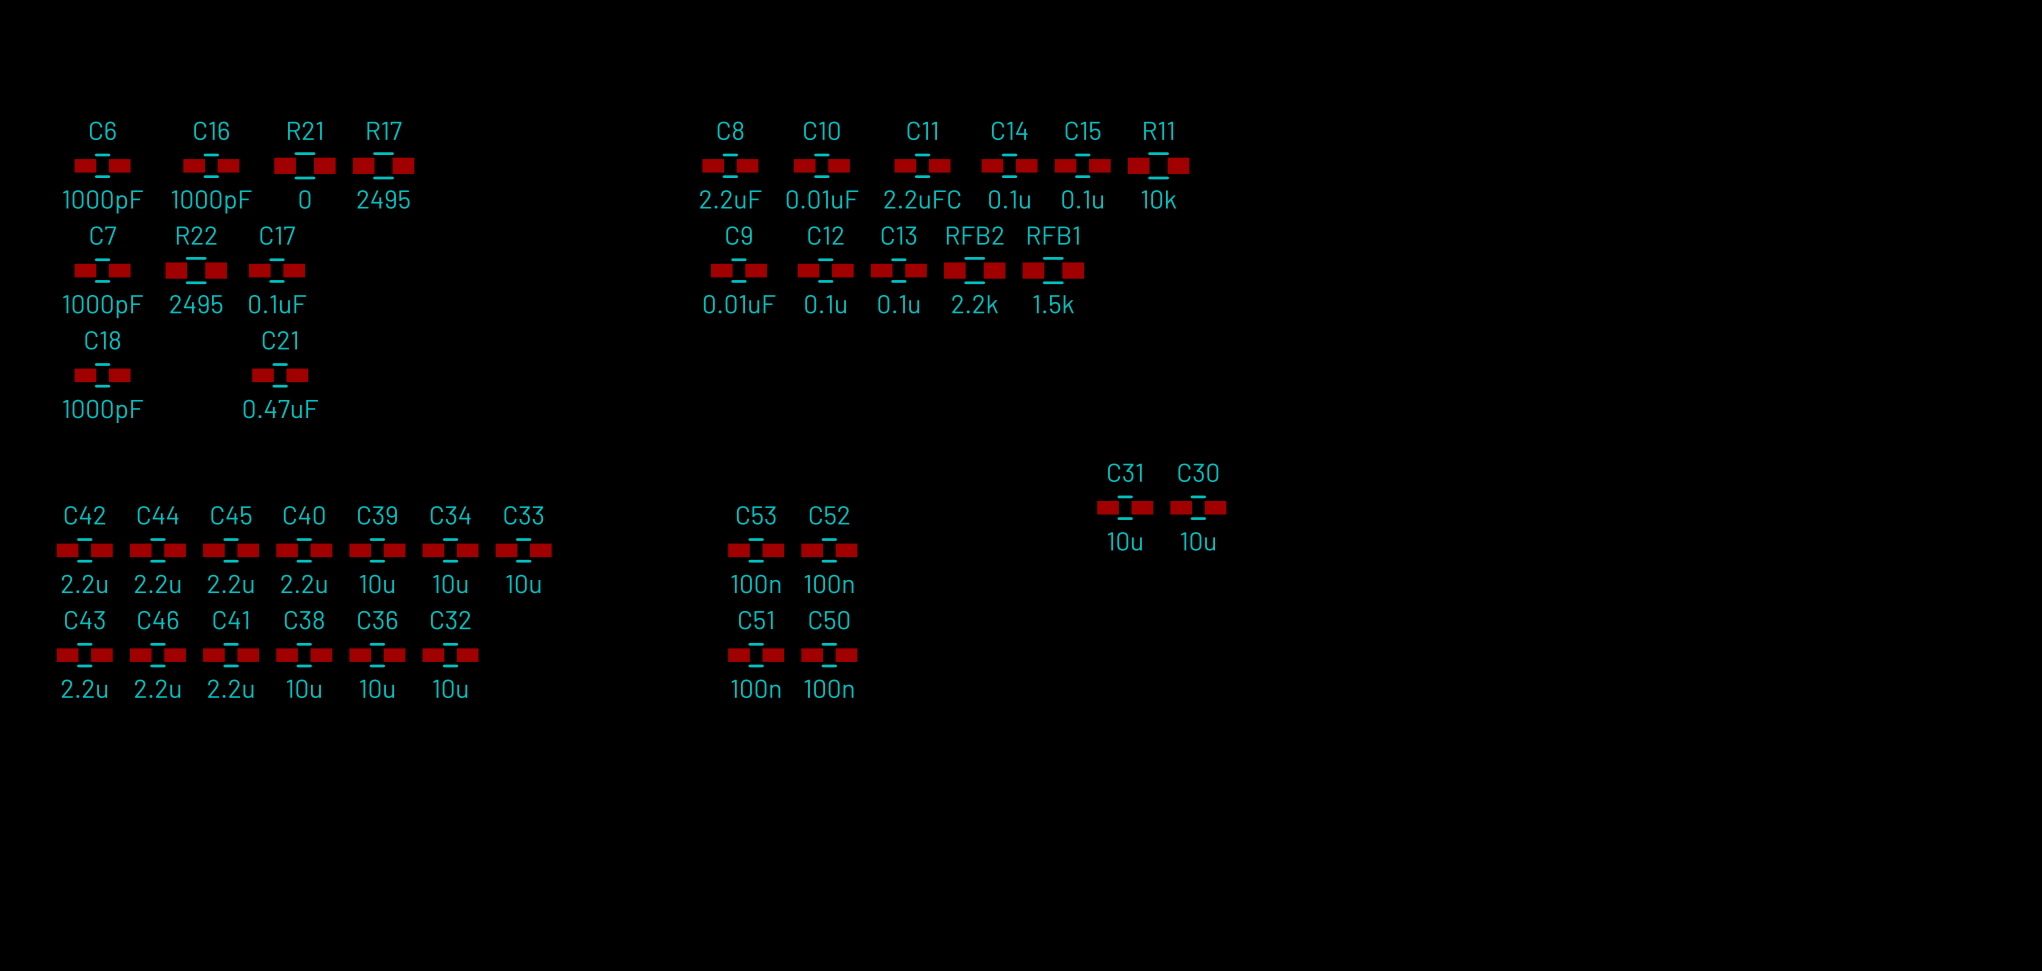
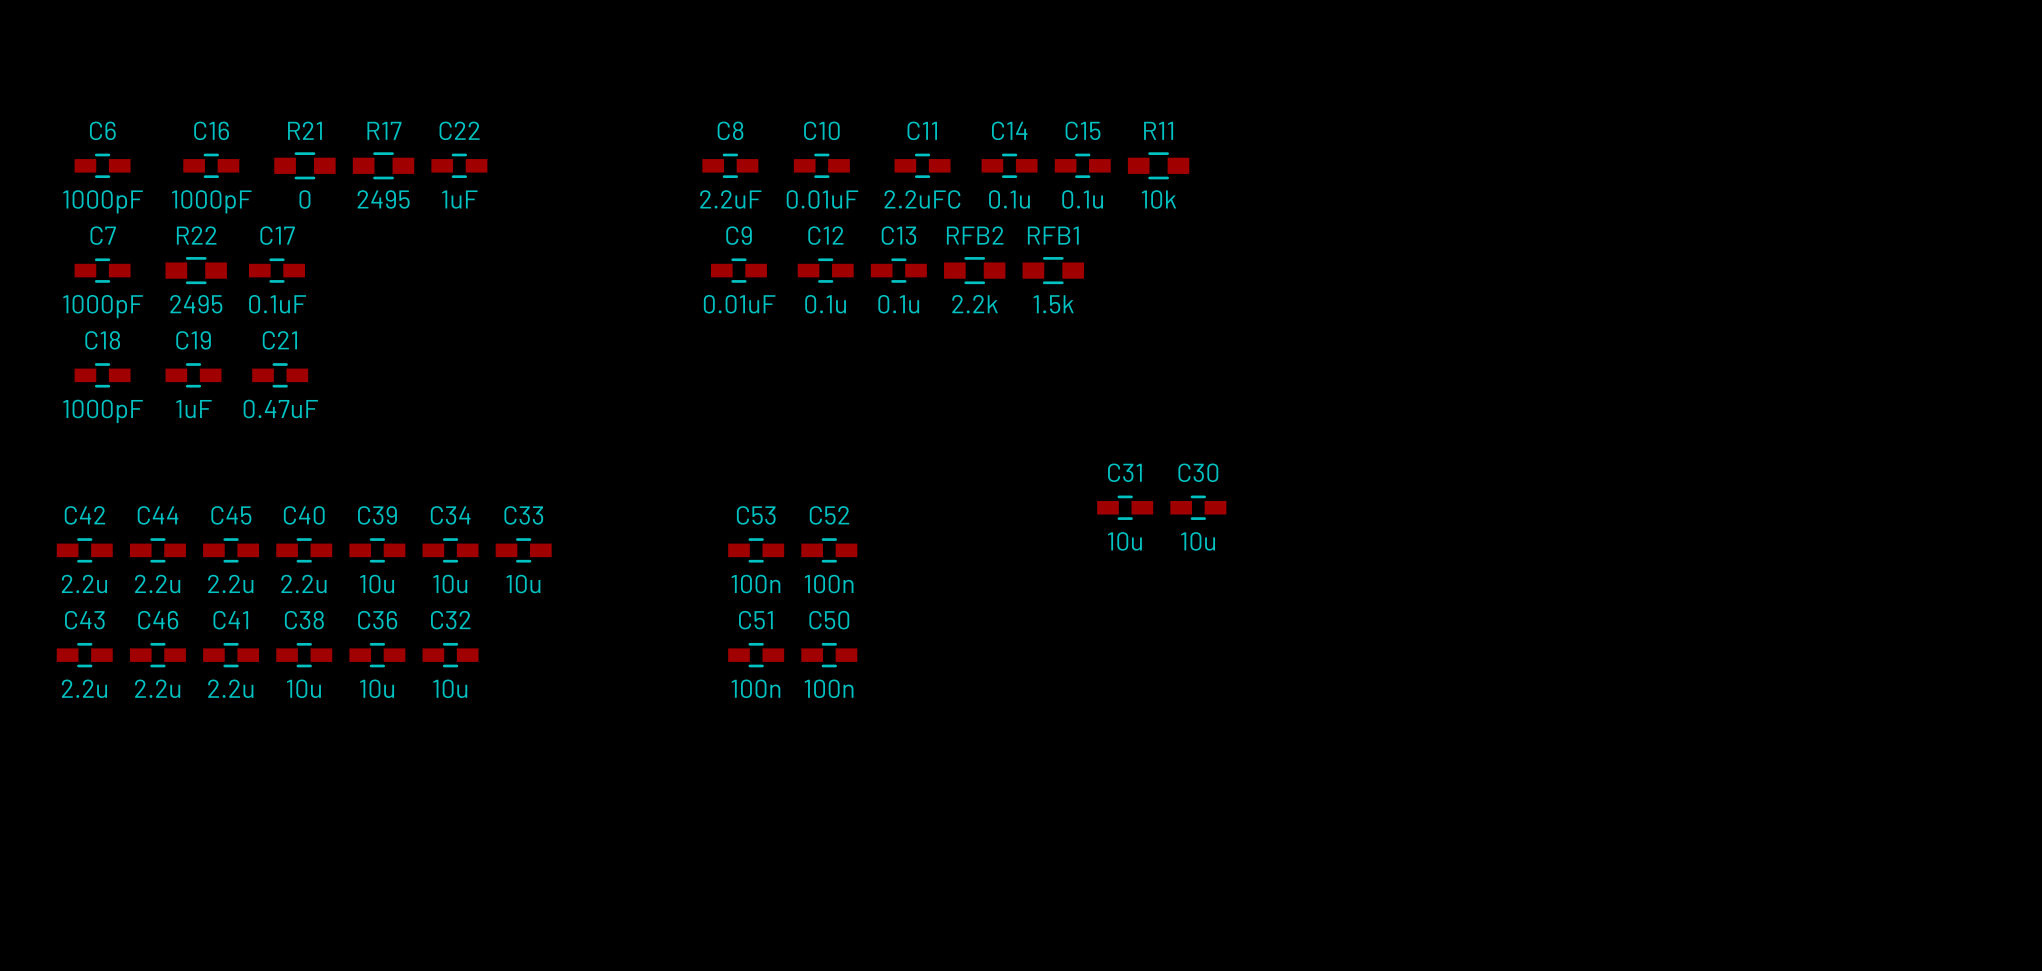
C22: none -> 1uF (459, 165)
C19: none -> 1uF (193, 375)

